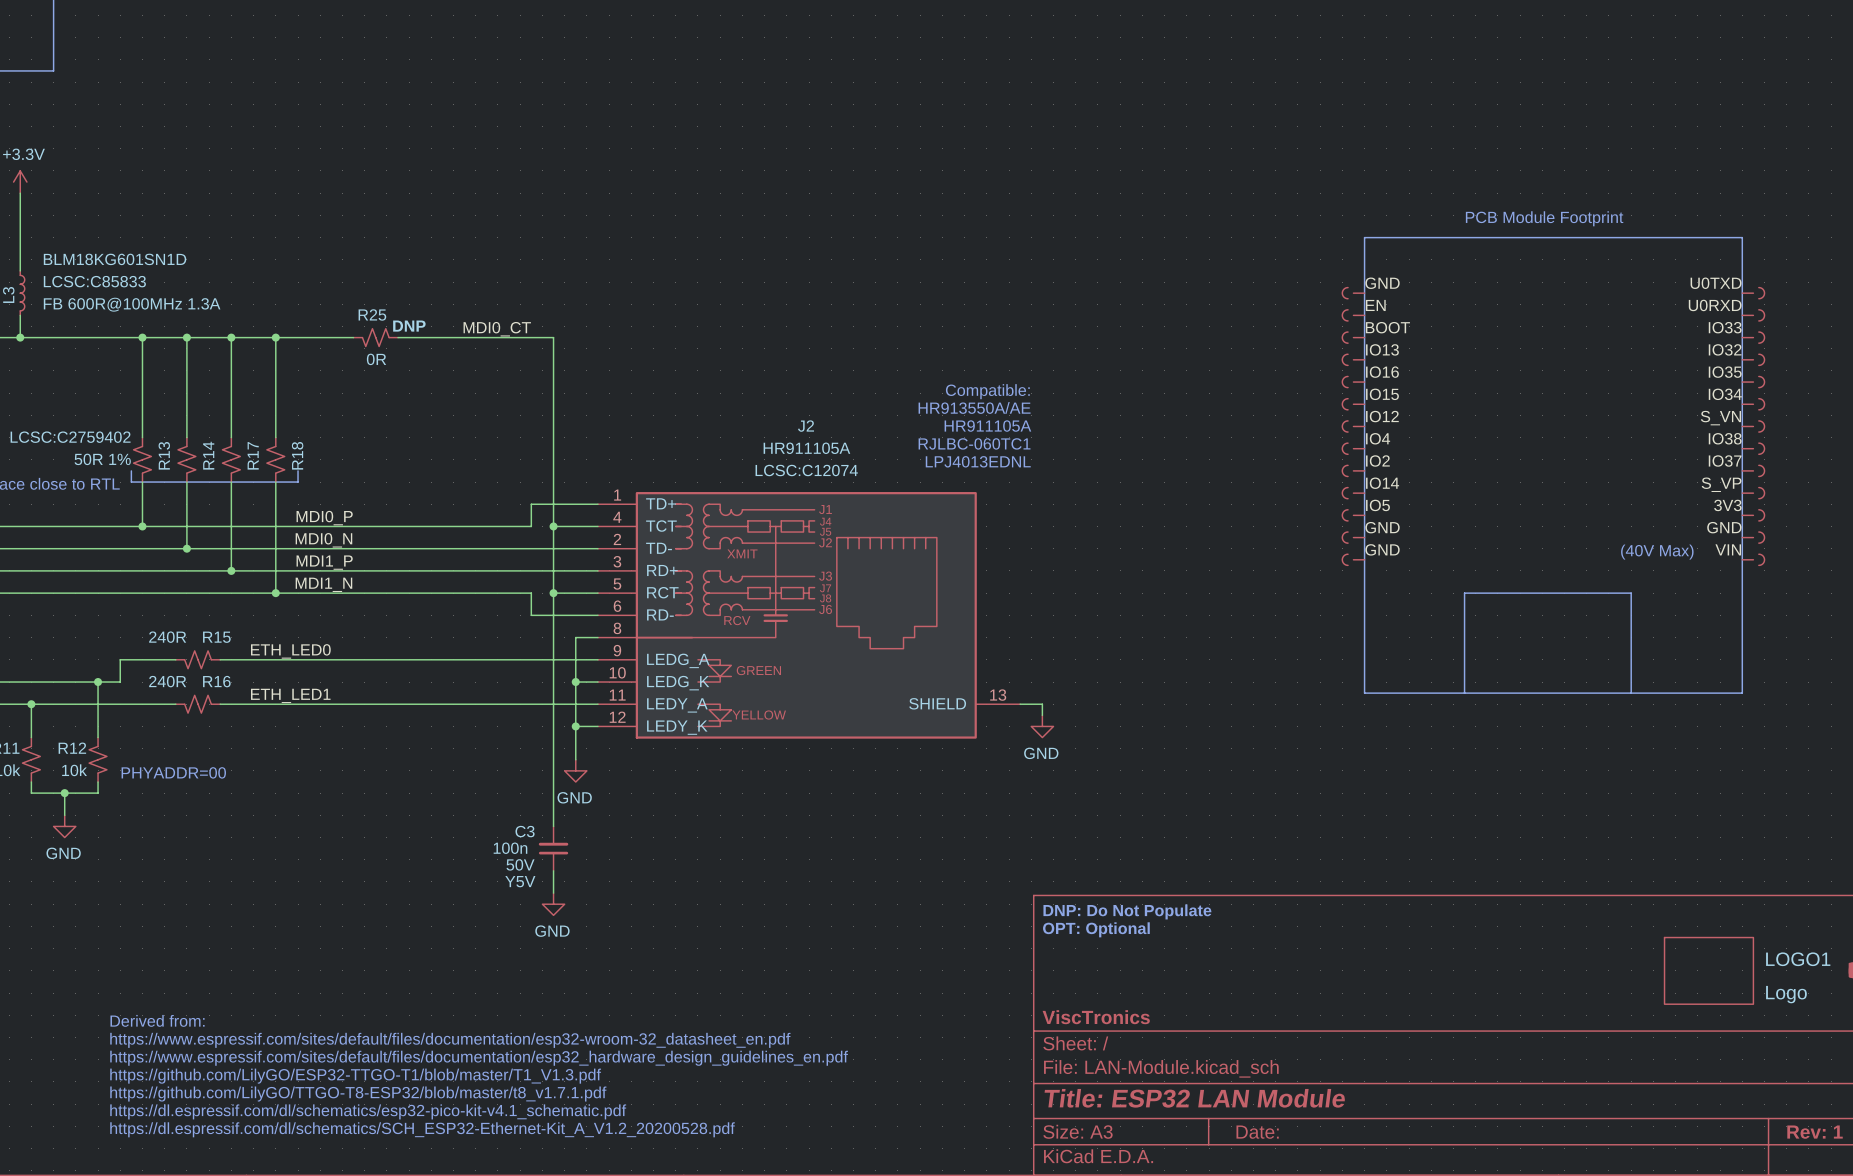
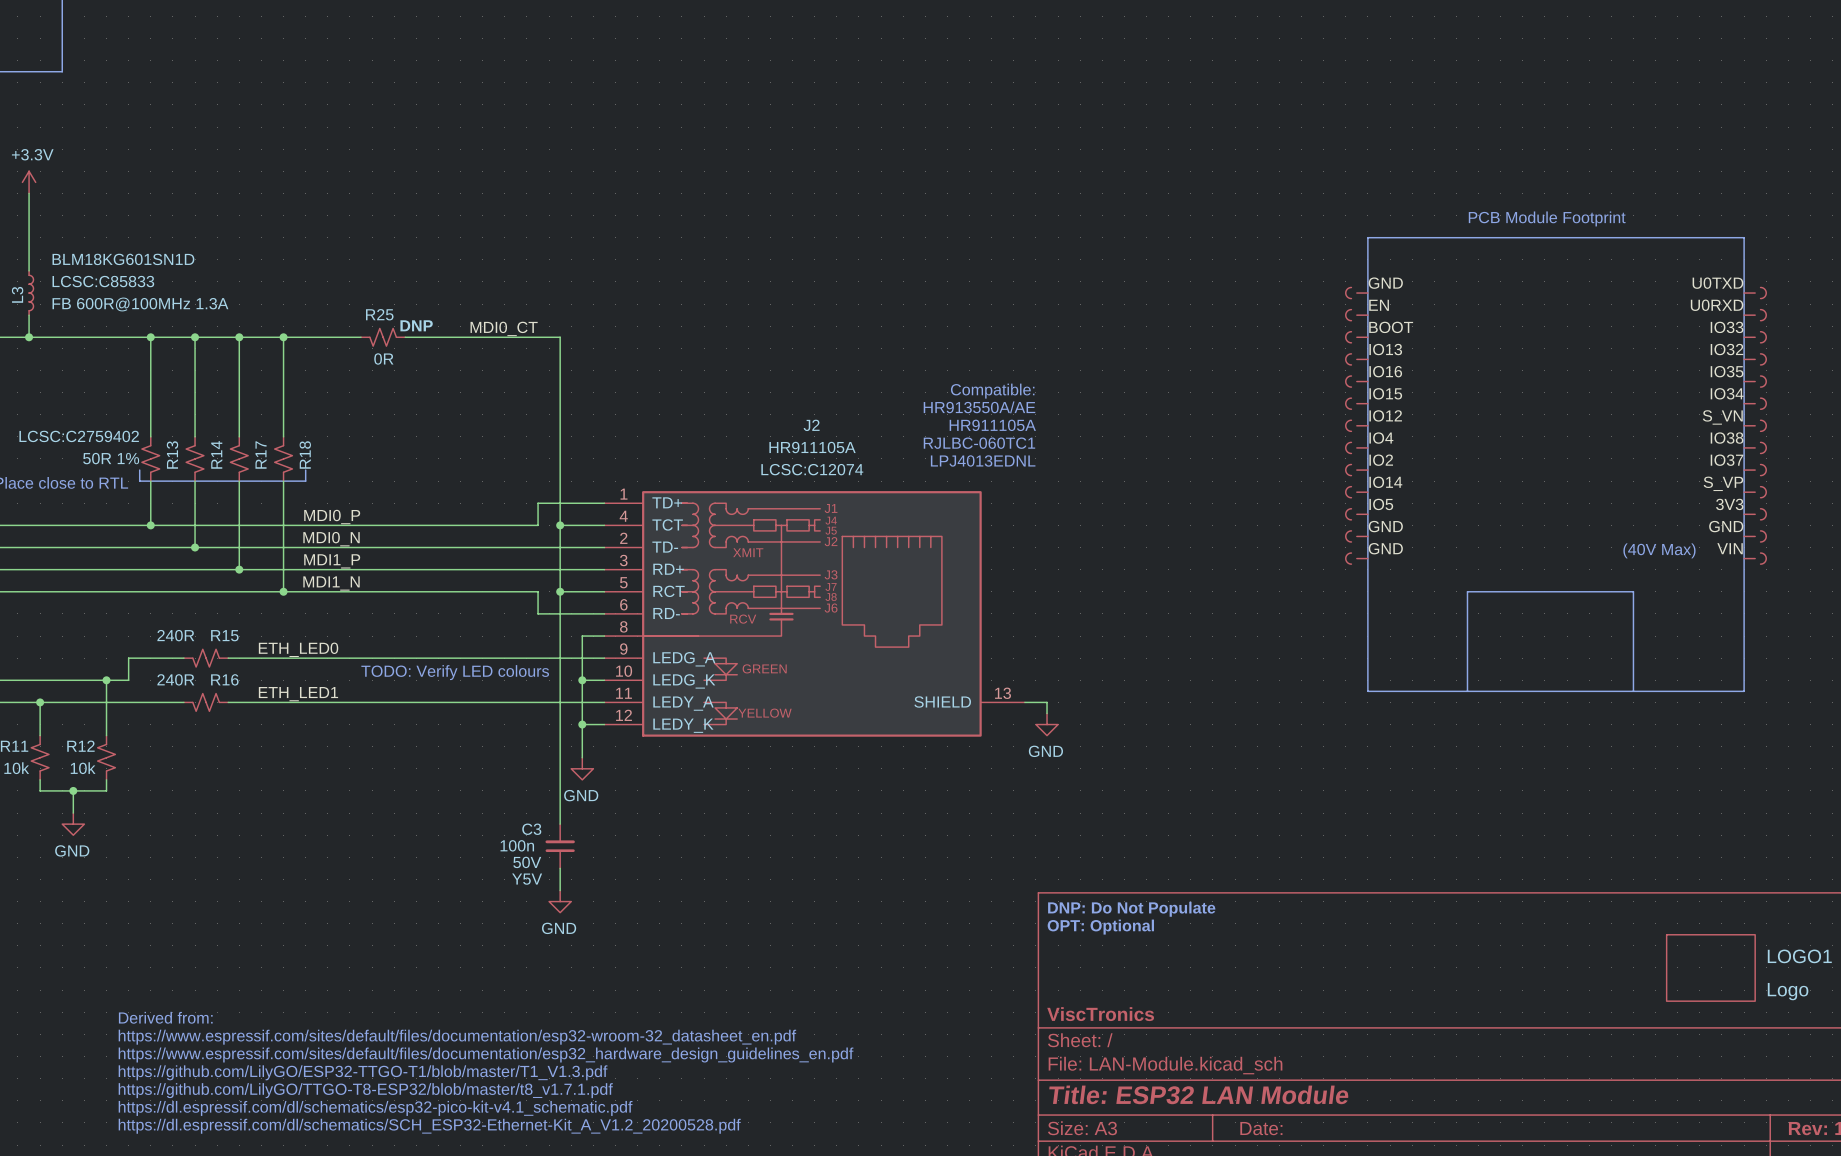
text: none -> TODO: Verify LED colours (455, 672)
text: PHYADDR=00 (173, 772) -> none

